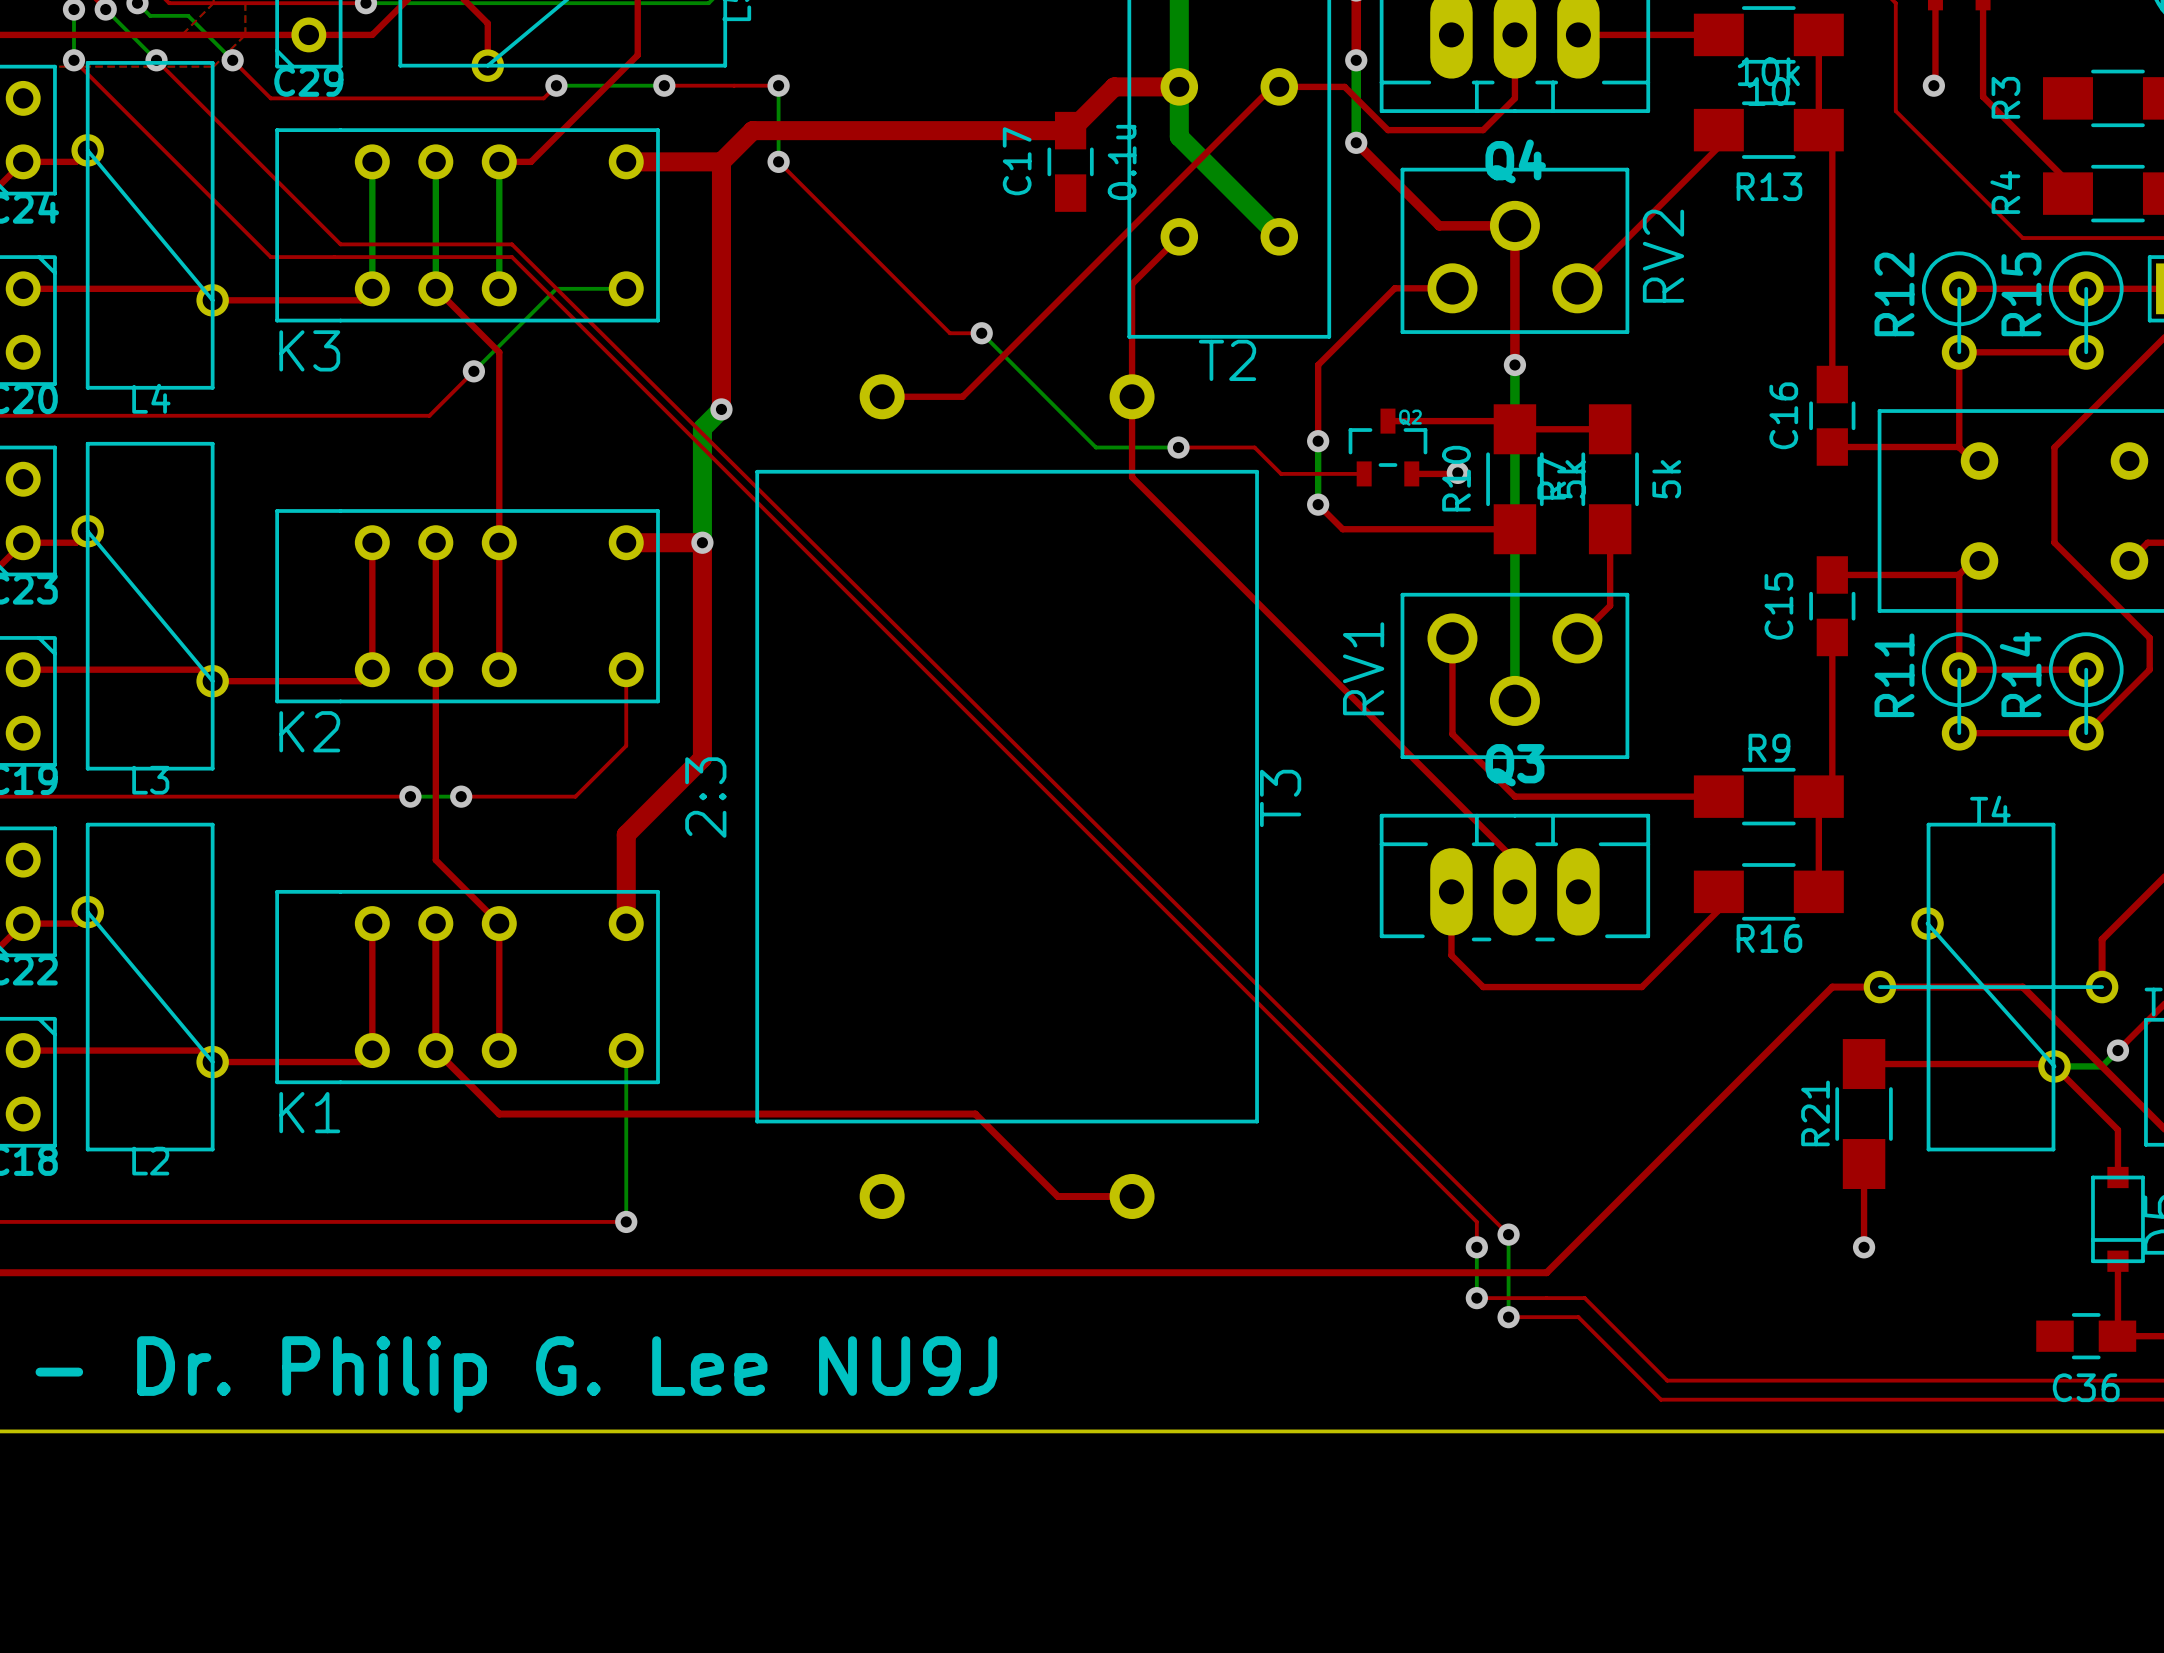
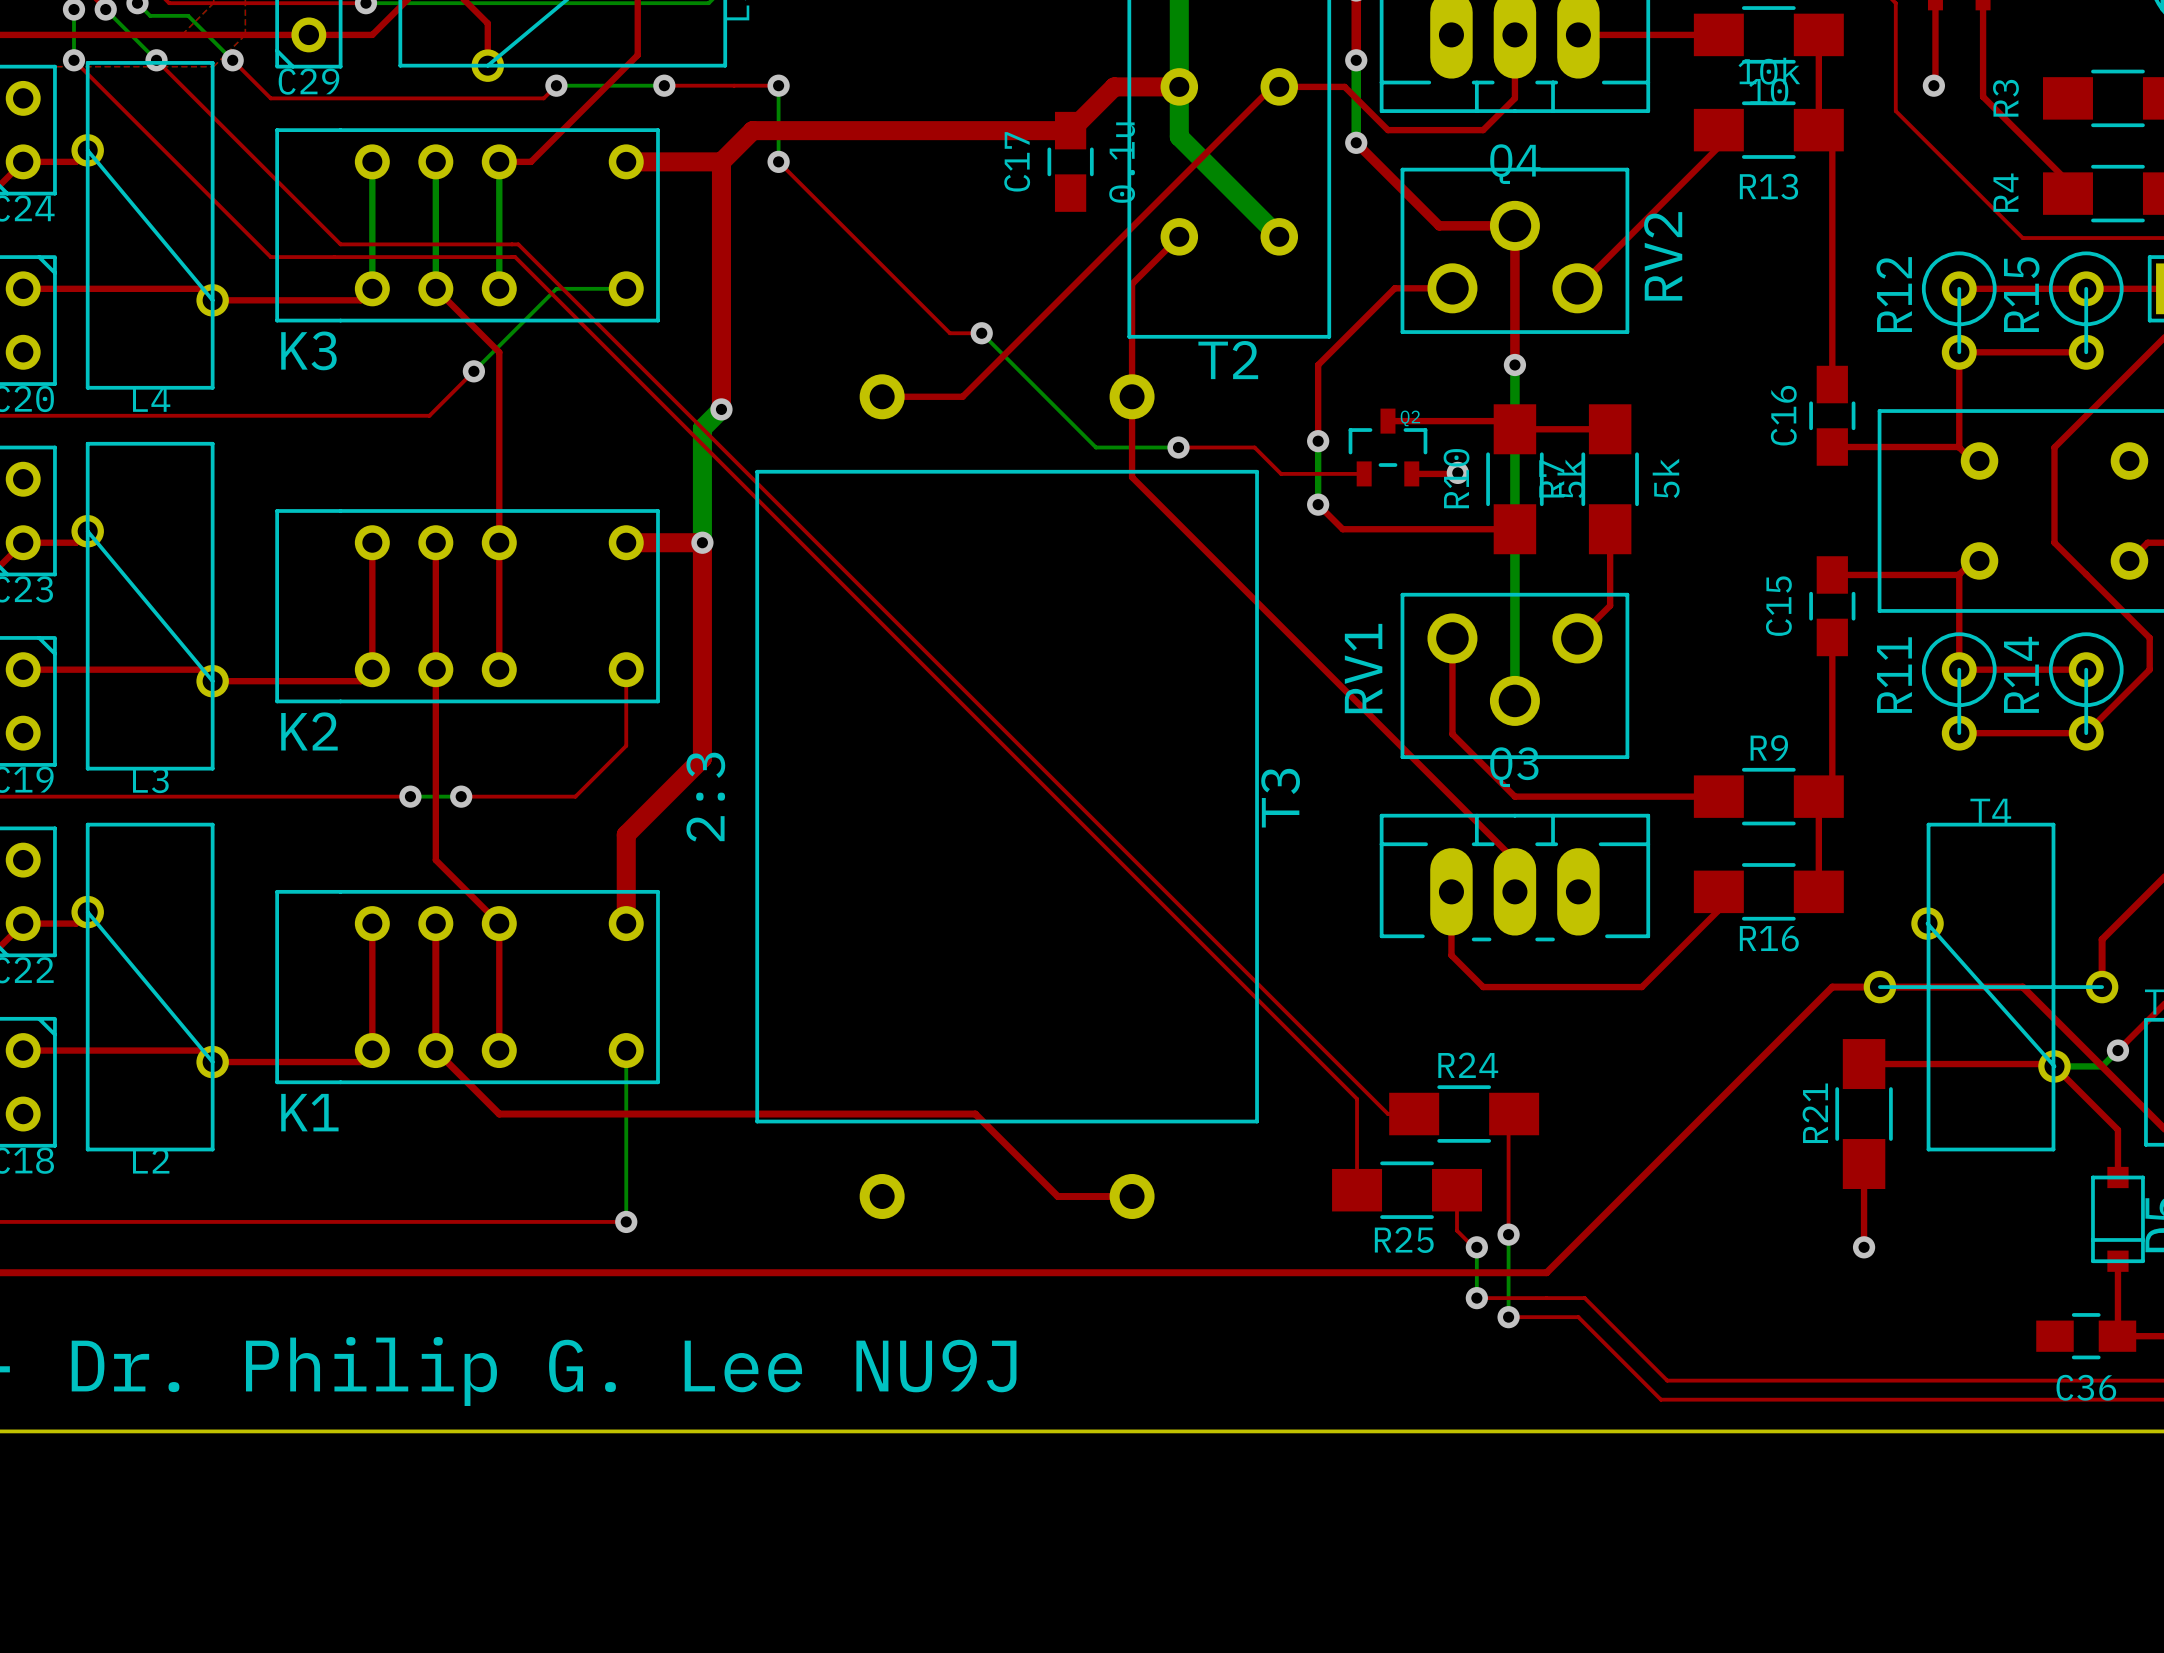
top track: (511, 244) (1508, 1234) -> (511, 244) (518, 244) (1387, 1114) (1414, 1114)
top track: (511, 257) (1476, 1221) (1476, 1247) -> (511, 257) (515, 257) (1357, 1098) (1357, 1190)
R25: none -> (1464, 1114)
top track: none -> (1514, 1114) (1508, 1119) (1508, 1234)
R24: none -> (1407, 1190)
top track: none -> (1457, 1190) (1457, 1230) (1473, 1247) (1476, 1247)

